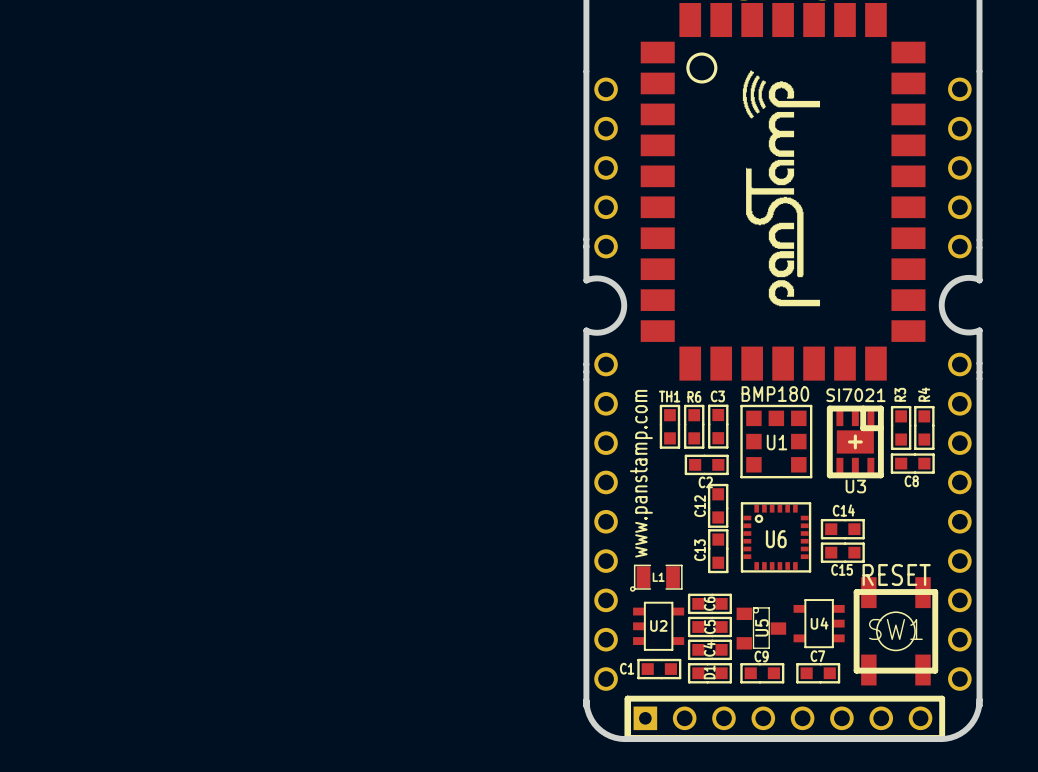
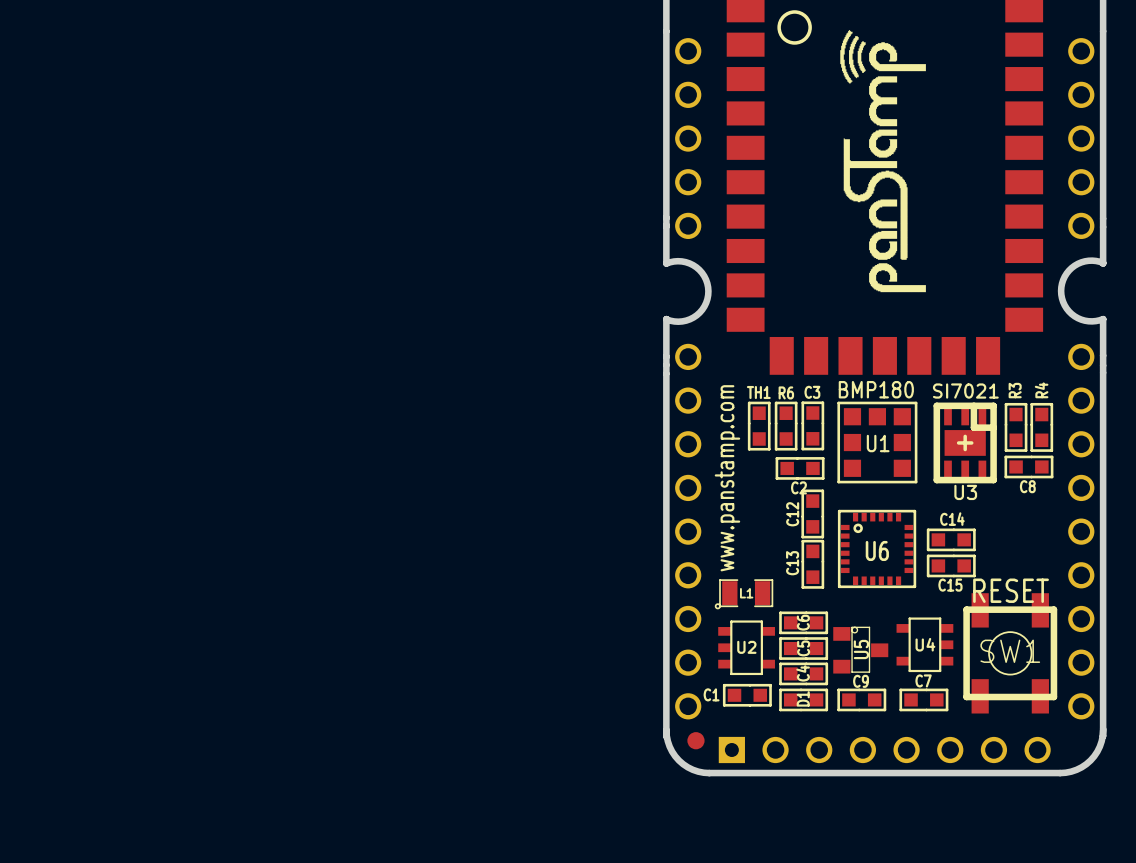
part footprint: [624, 695, 946, 741] -> [718, 736, 1051, 764]
part: none -> (695, 740)

